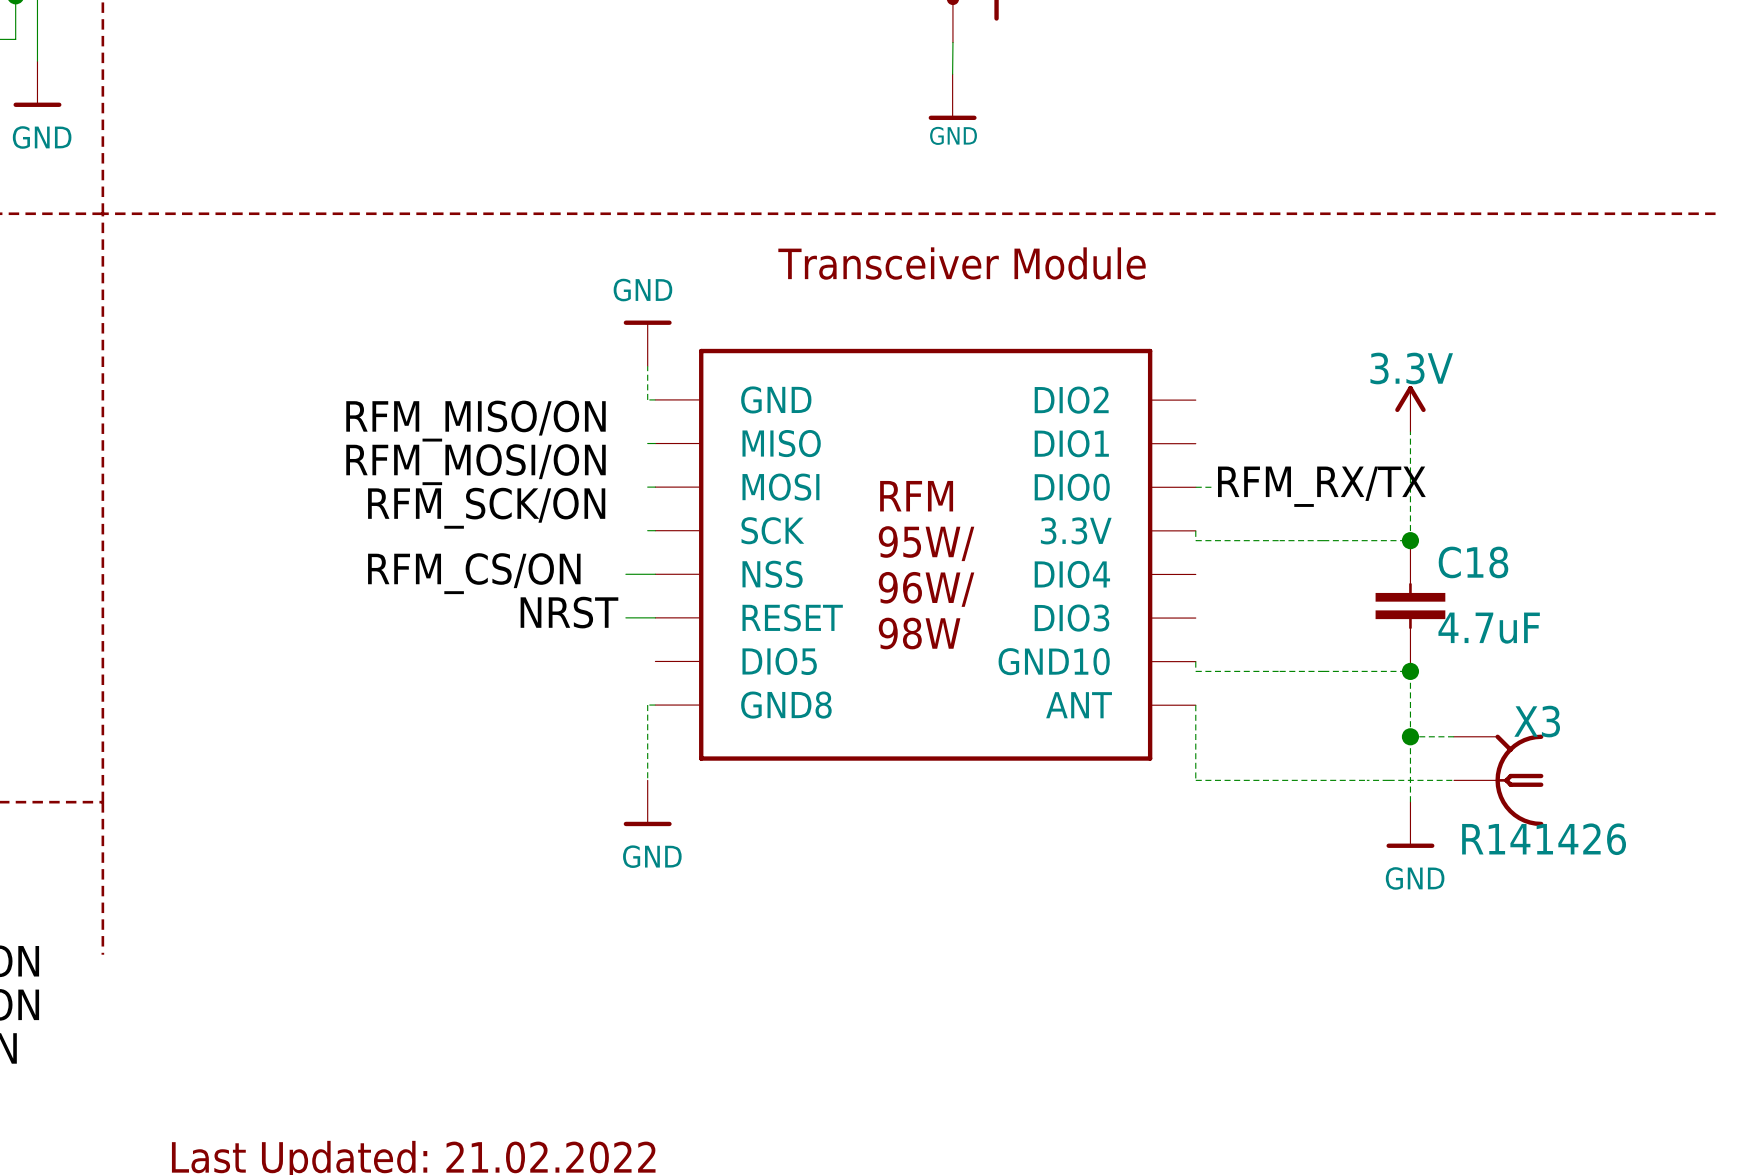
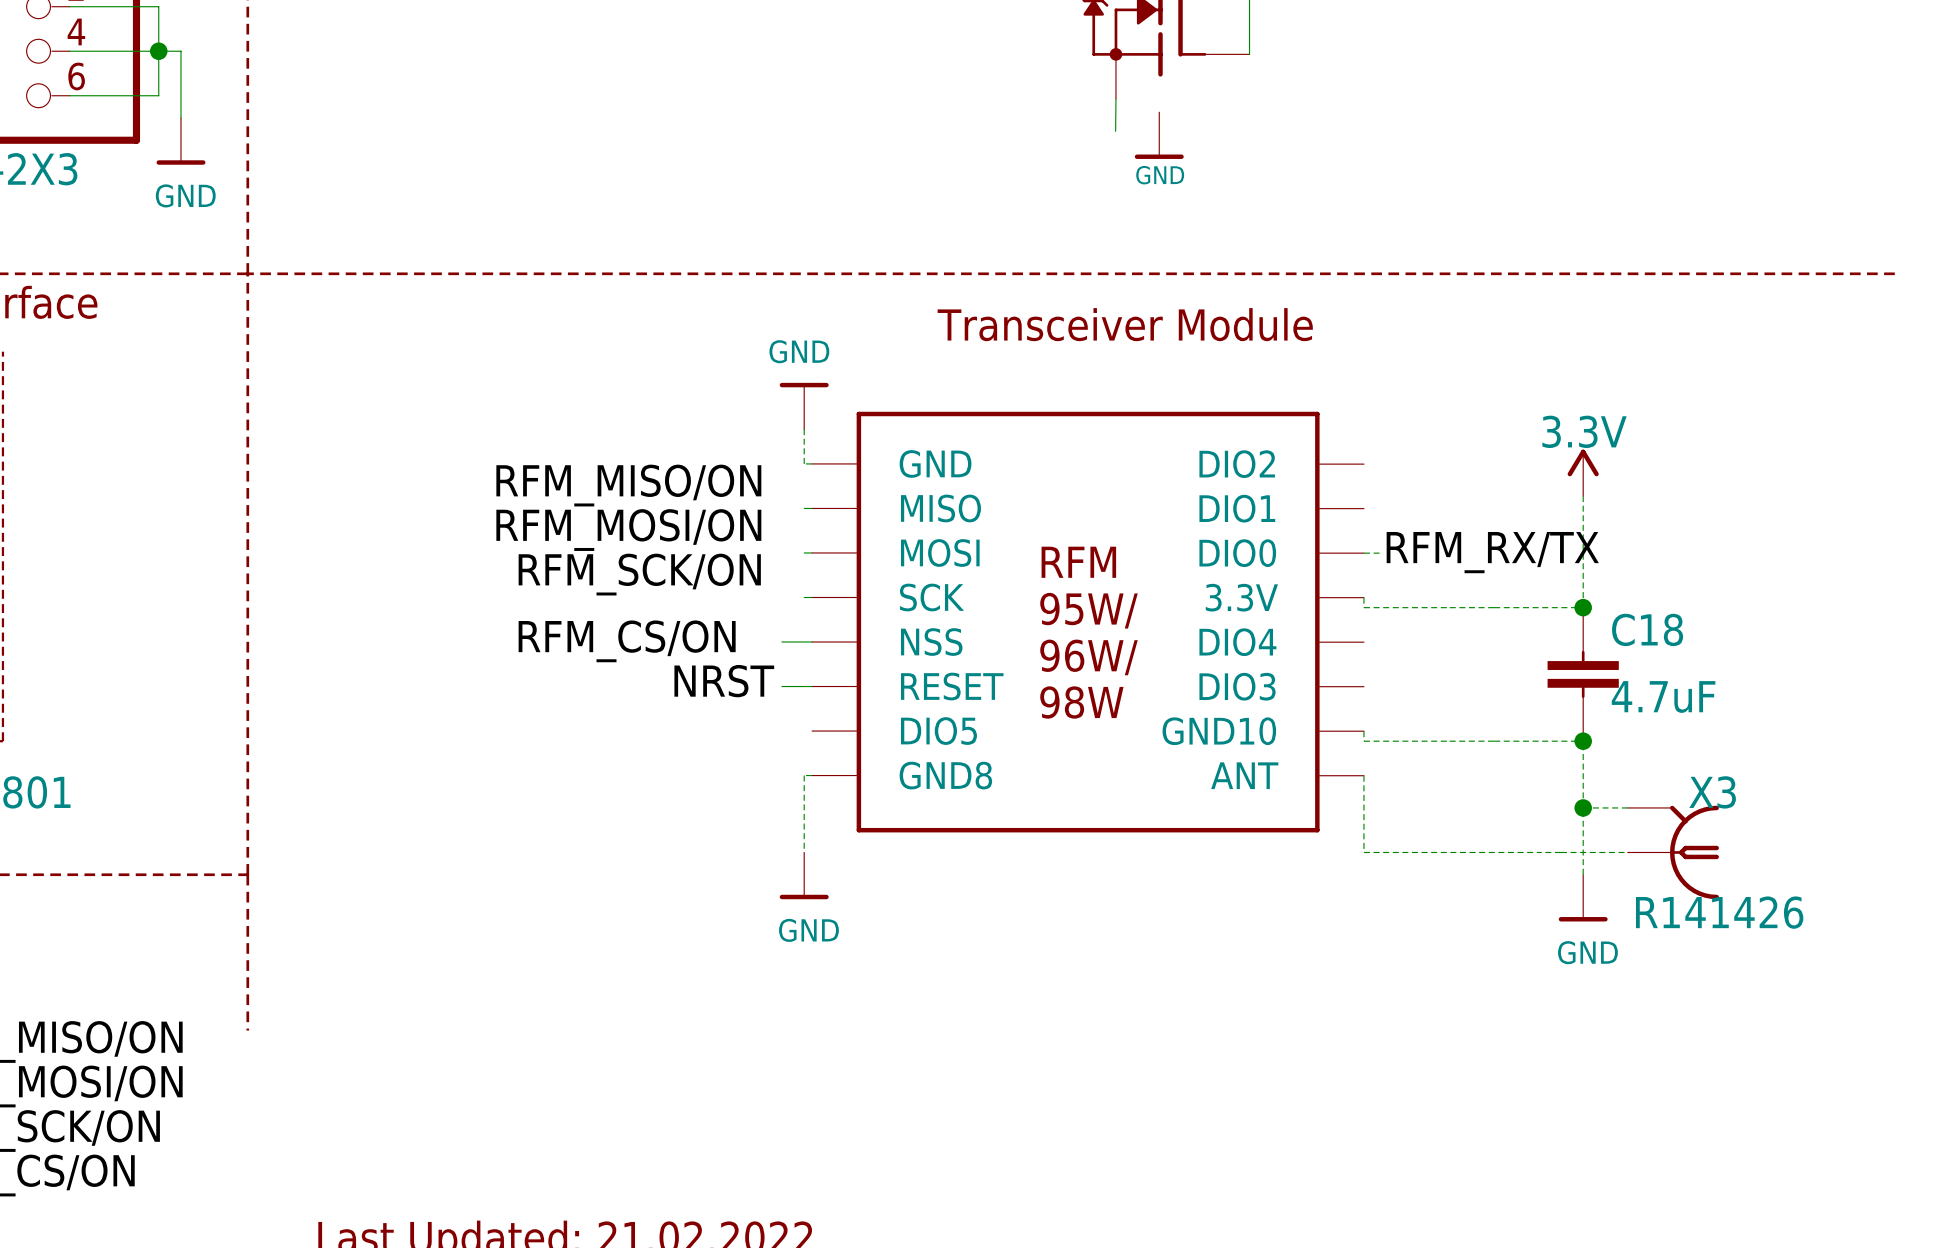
power symbol position: GND (952, 97) -> GND (1159, 135)

